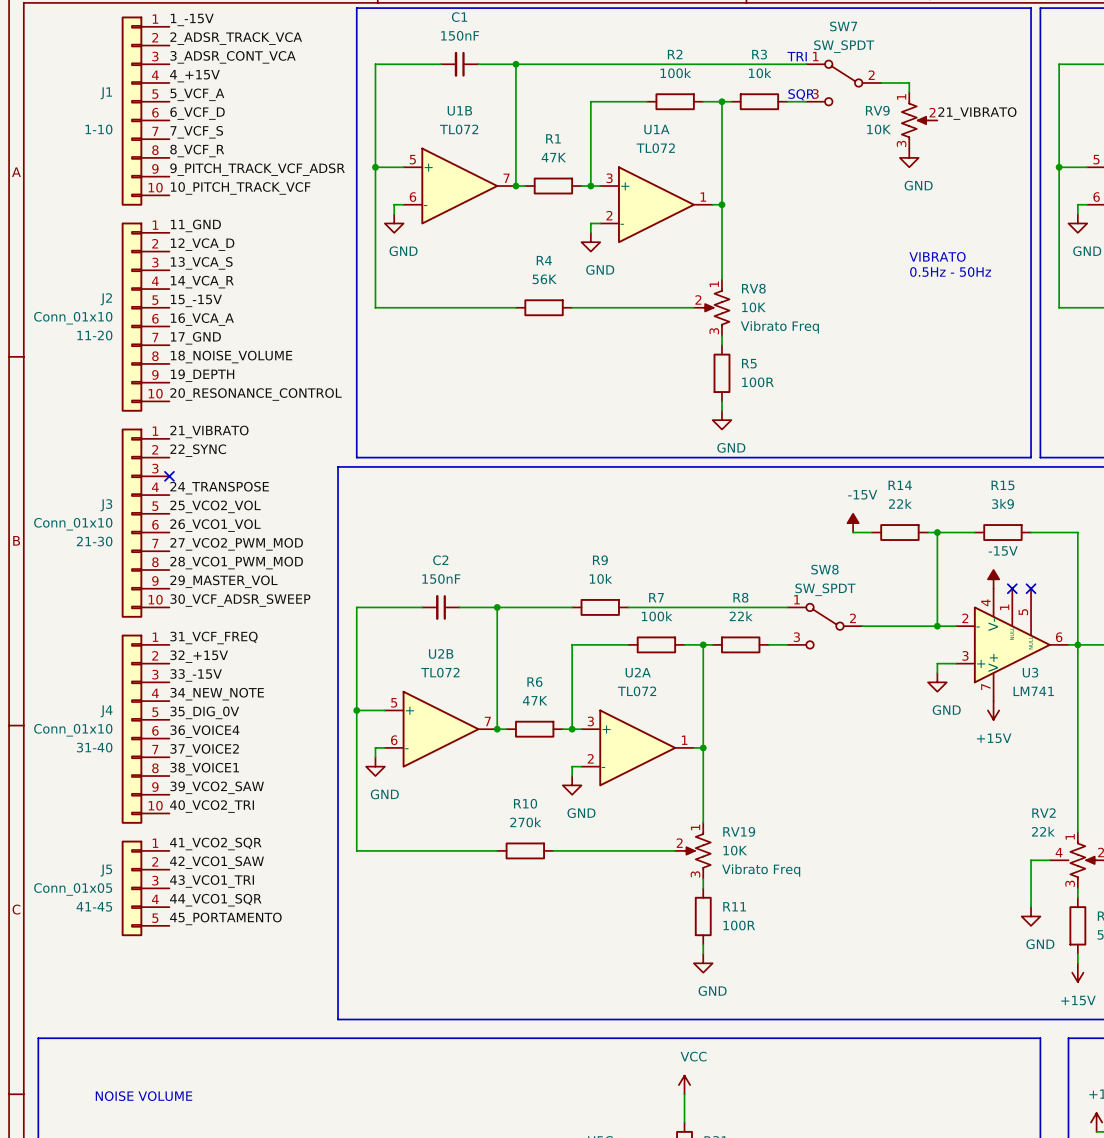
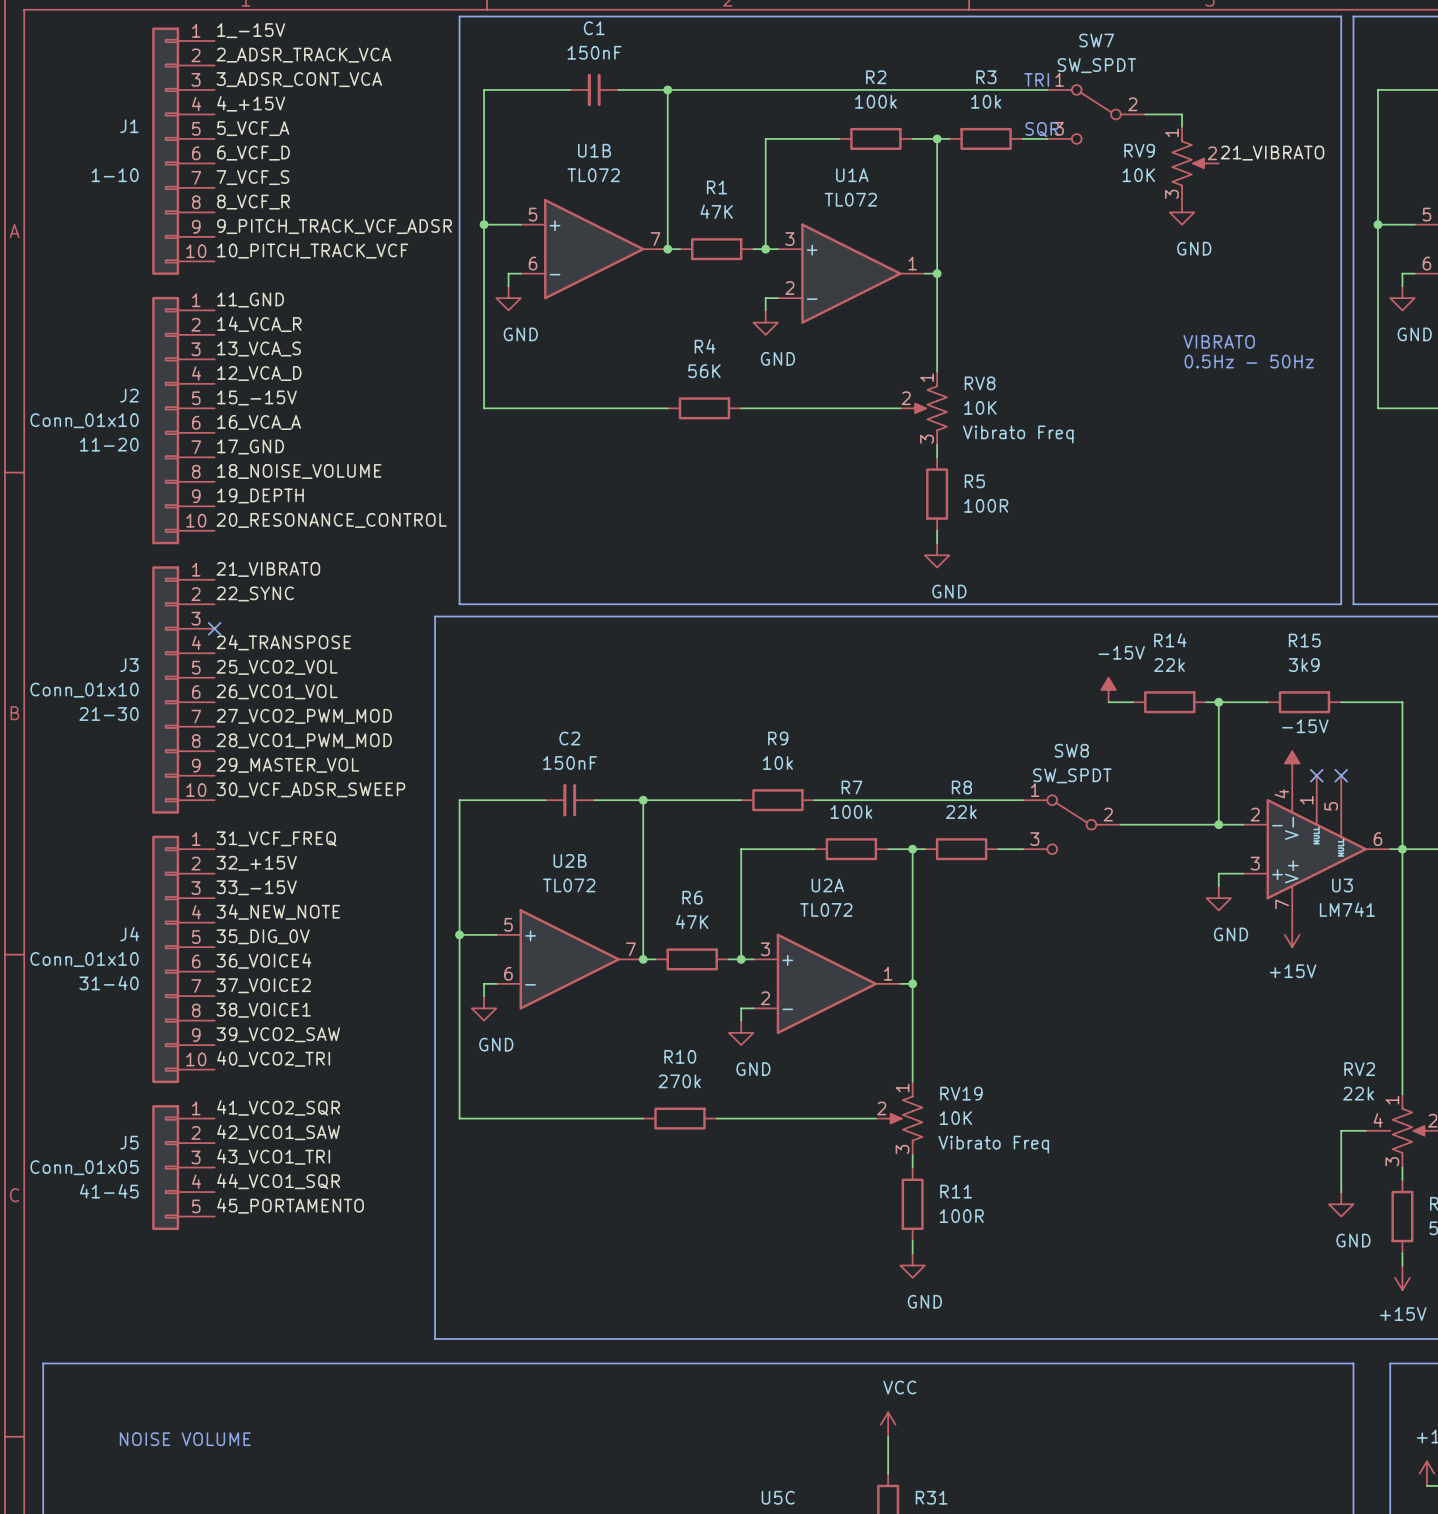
label: 12_VCA_D (202, 244) -> 14_VCA_R (259, 324)
label: 14_VCA_R (202, 282) -> 12_VCA_D (259, 373)

